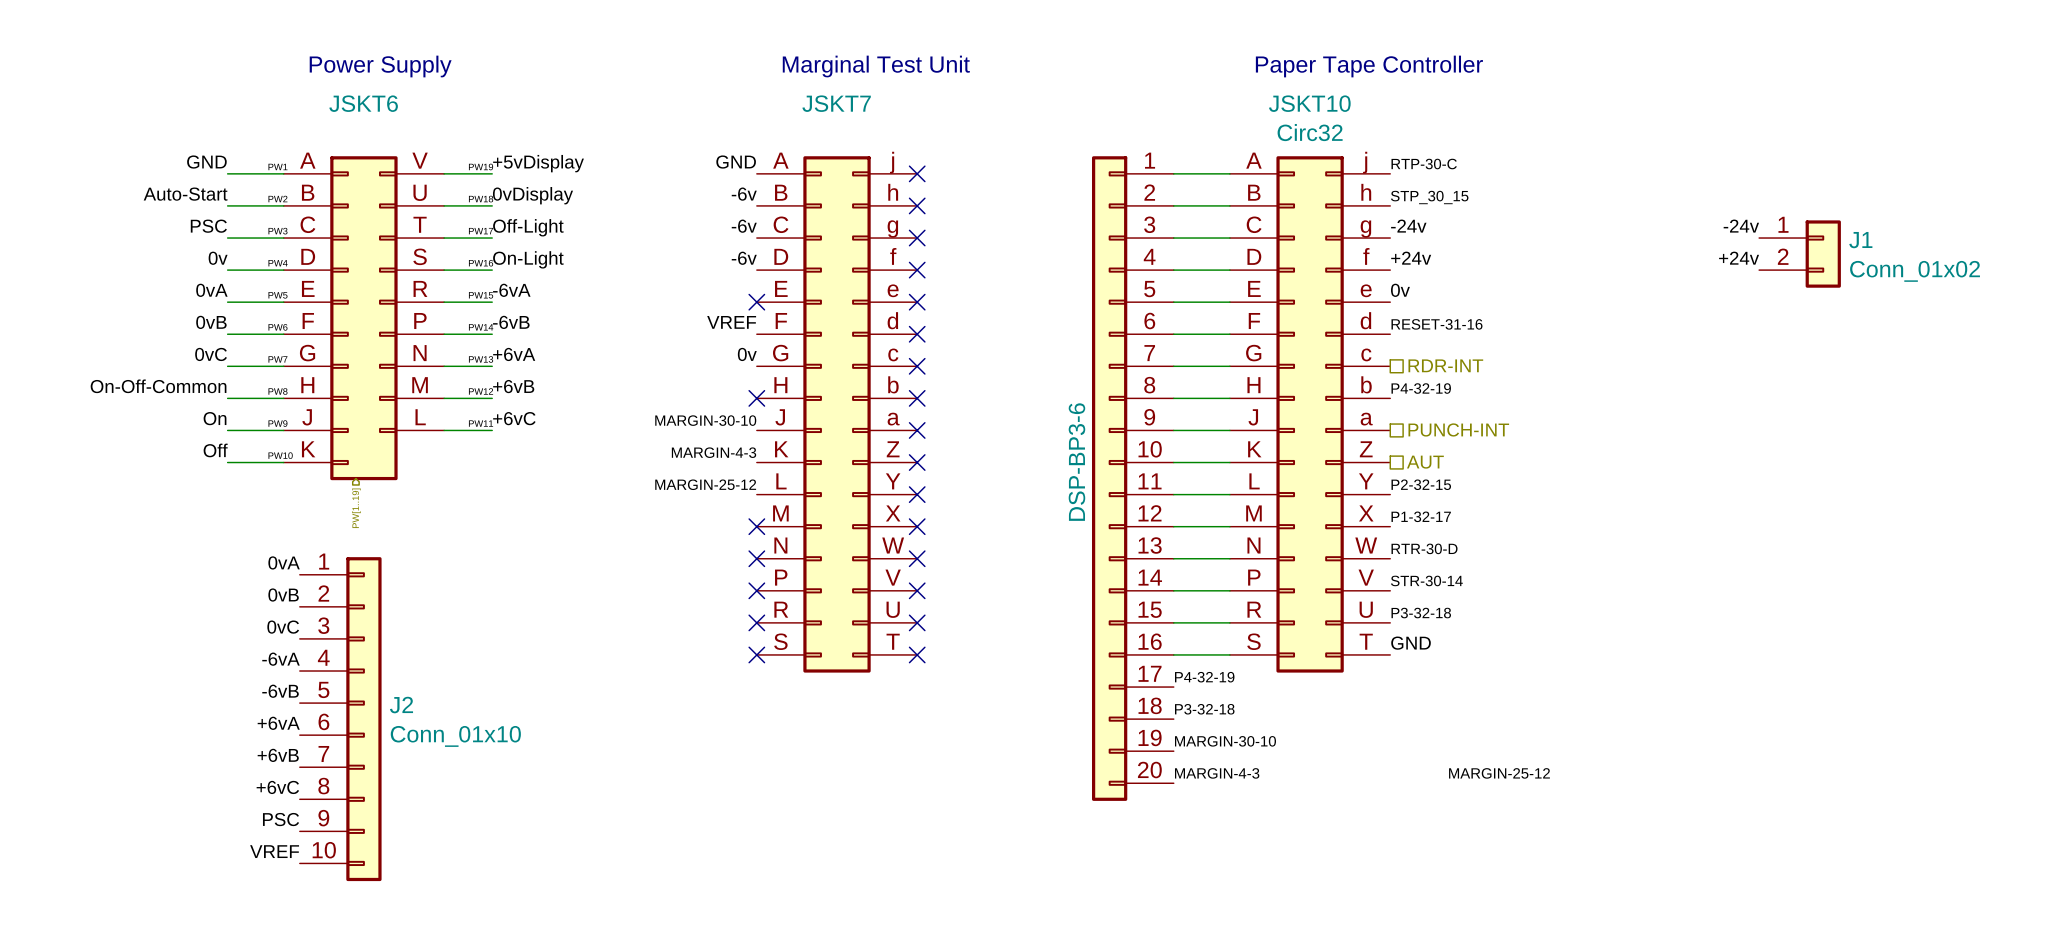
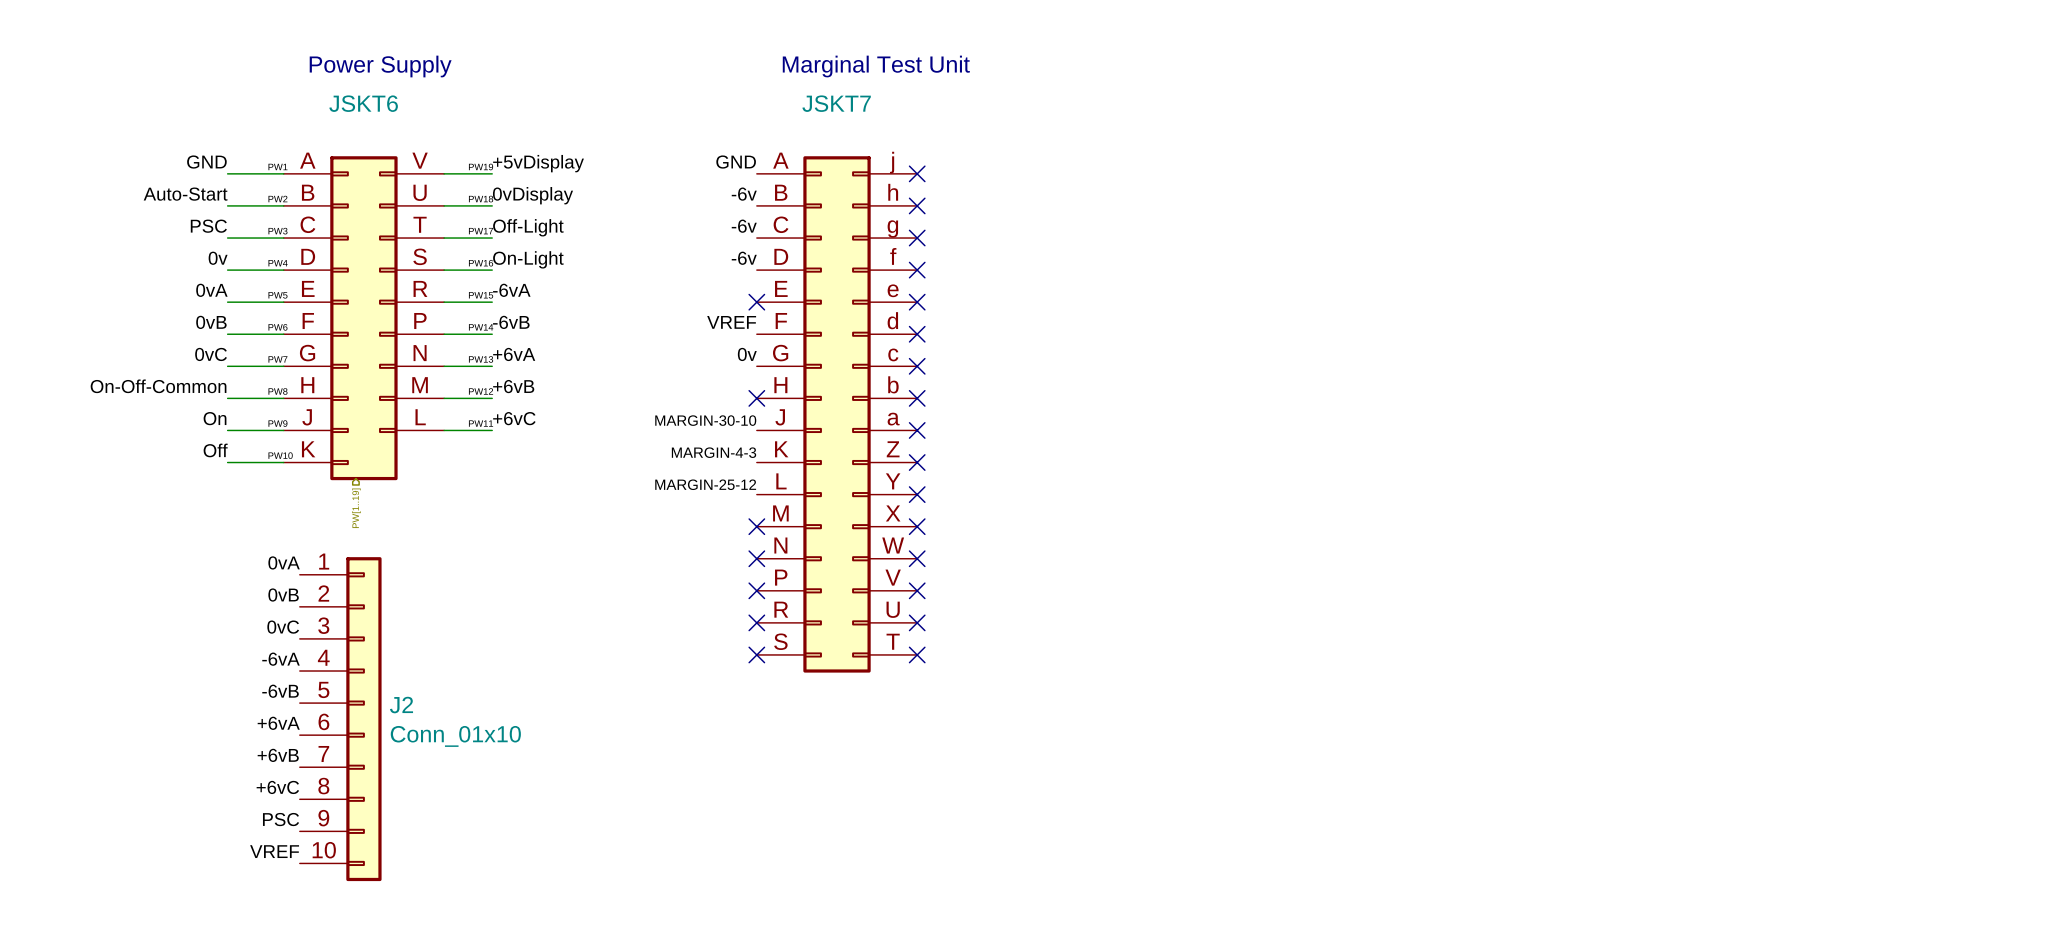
text: Paper Tape Controller (1369, 66) -> none
label: RTP-30-C (1424, 164) -> none
wire: (1173, 173) (1229, 173) -> none
label: STP_30_15 (1429, 197) -> none
wire: (1173, 205) (1229, 205) -> none
label: -24v (1408, 226) -> none
label: -24v (1741, 226) -> none
wire: (1173, 238) (1229, 238) -> none
J1: Conn_01x02 (1800, 254) -> none
label: +24v (1411, 258) -> none
label: +24v (1739, 258) -> none
wire: (1173, 270) (1229, 270) -> none
label: 0v (1400, 290) -> none
wire: (1173, 302) (1229, 302) -> none
label: RESET-31-16 (1436, 324) -> none
wire: (1173, 334) (1229, 334) -> none
hierarchical label: RDR-INT (1445, 365) -> none
wire: (1173, 366) (1229, 366) -> none
label: P4-32-19 (1421, 388) -> none
wire: (1173, 398) (1229, 398) -> none
JSKT10: Circ32 (1310, 414) -> none
hierarchical label: PUNCH-INT (1458, 429) -> none
wire: (1173, 430) (1229, 430) -> none
wire: (1173, 462) (1229, 462) -> none
hierarchical label: AUT (1425, 462) -> none
DSP-BP3-6: (1132, 478) -> none
label: P2-32-15 (1421, 484) -> none
wire: (1173, 494) (1229, 494) -> none
label: P1-32-17 (1421, 516) -> none
wire: (1173, 526) (1229, 526) -> none
label: RTR-30-D (1424, 548) -> none
wire: (1173, 558) (1229, 558) -> none
label: STR-30-14 (1426, 580) -> none
wire: (1173, 590) (1229, 590) -> none
label: P3-32-18 (1421, 613) -> none
wire: (1173, 622) (1229, 622) -> none
label: GND (1411, 643) -> none
wire: (1173, 654) (1229, 654) -> none
label: P4-32-19 (1204, 677) -> none
label: P3-32-18 (1204, 709) -> none
label: MARGIN-30-10 (1225, 741) -> none
label: MARGIN-4-3 (1217, 773) -> none
label: MARGIN-25-12 (1499, 773) -> none

